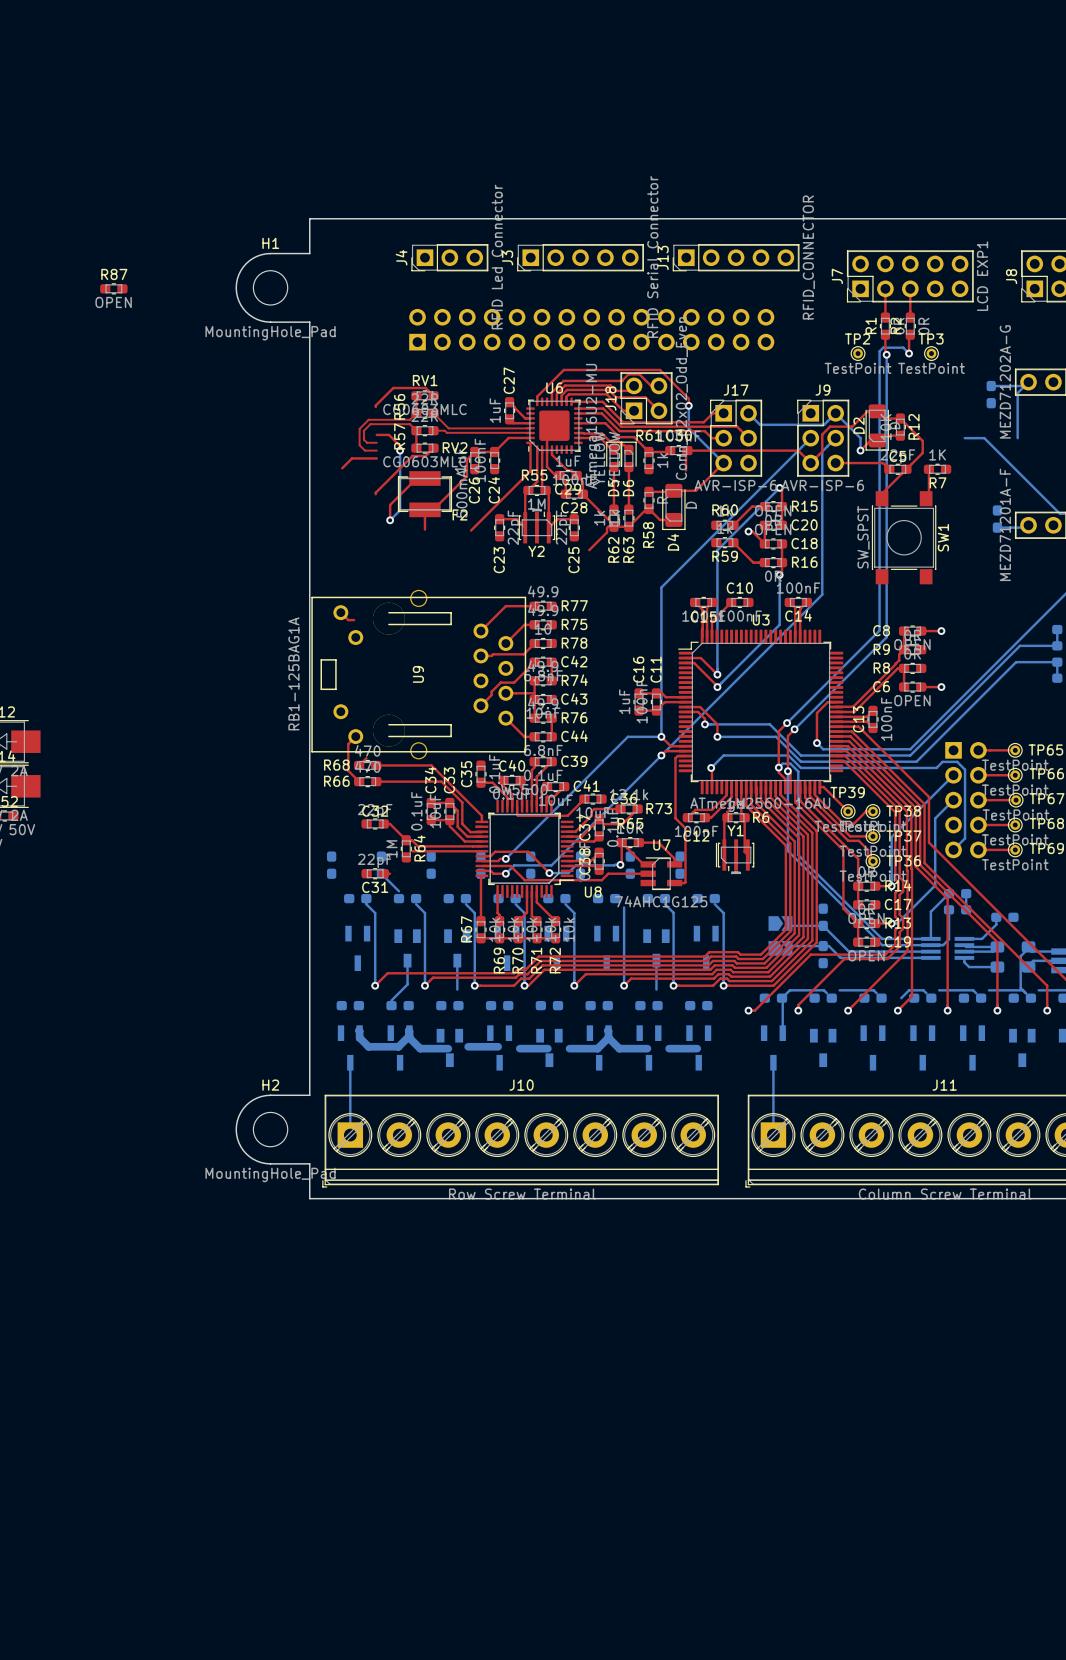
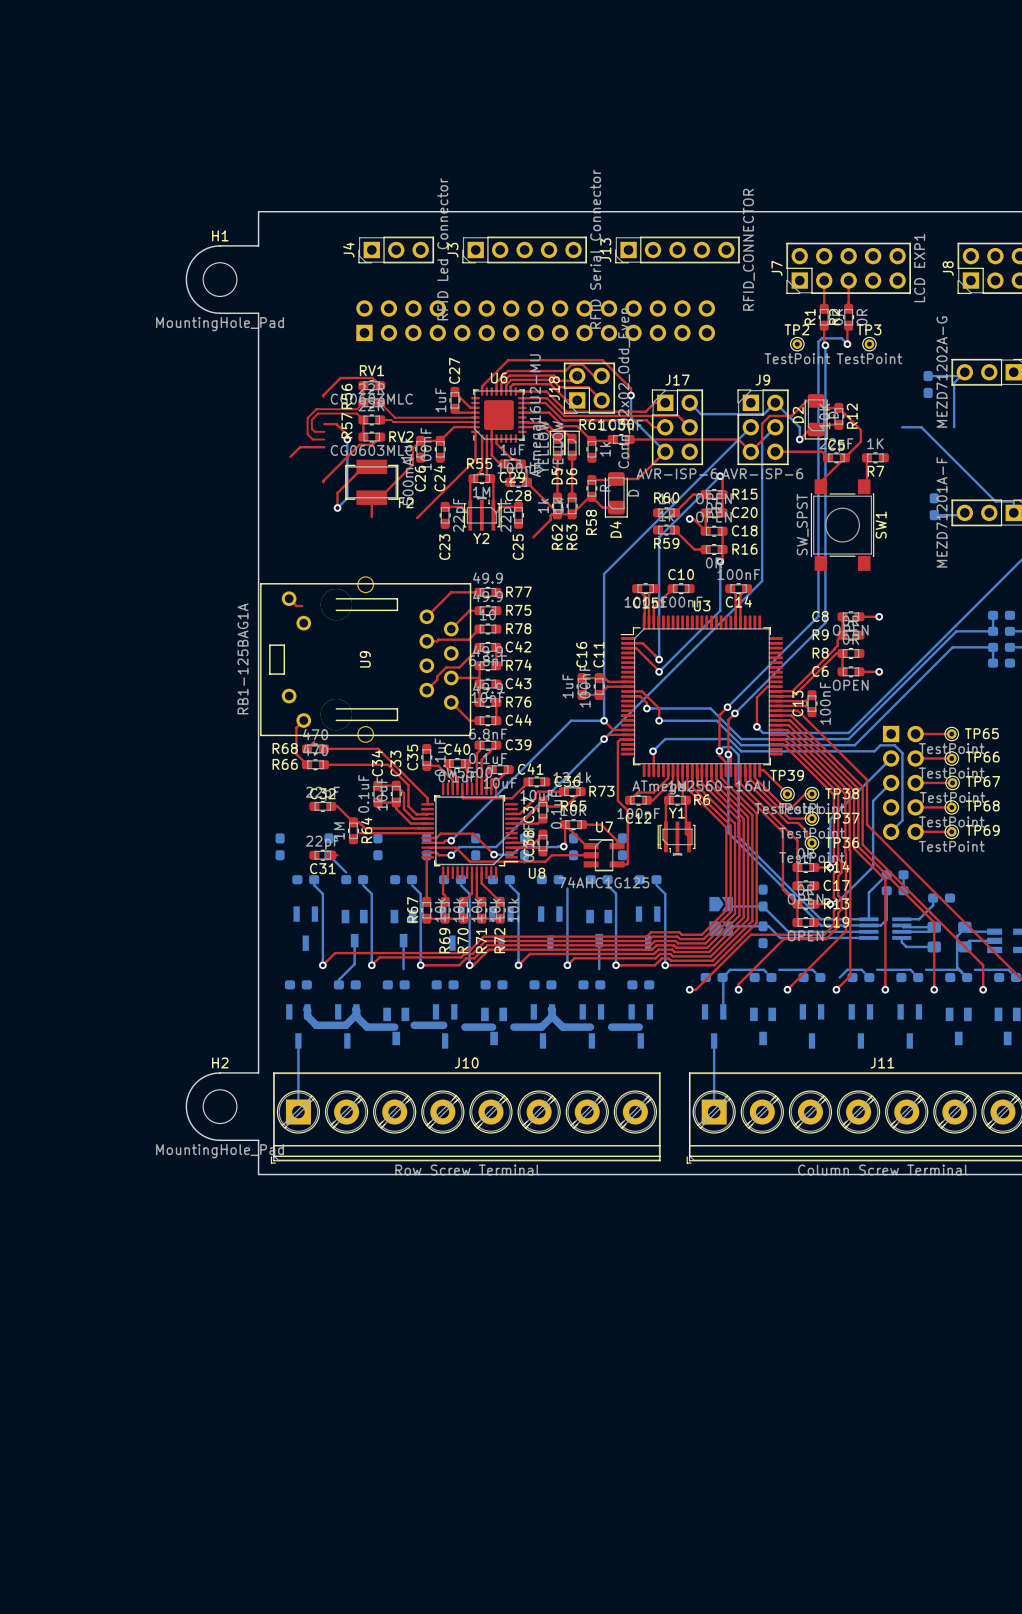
R87: OPEN (113, 288) -> none

